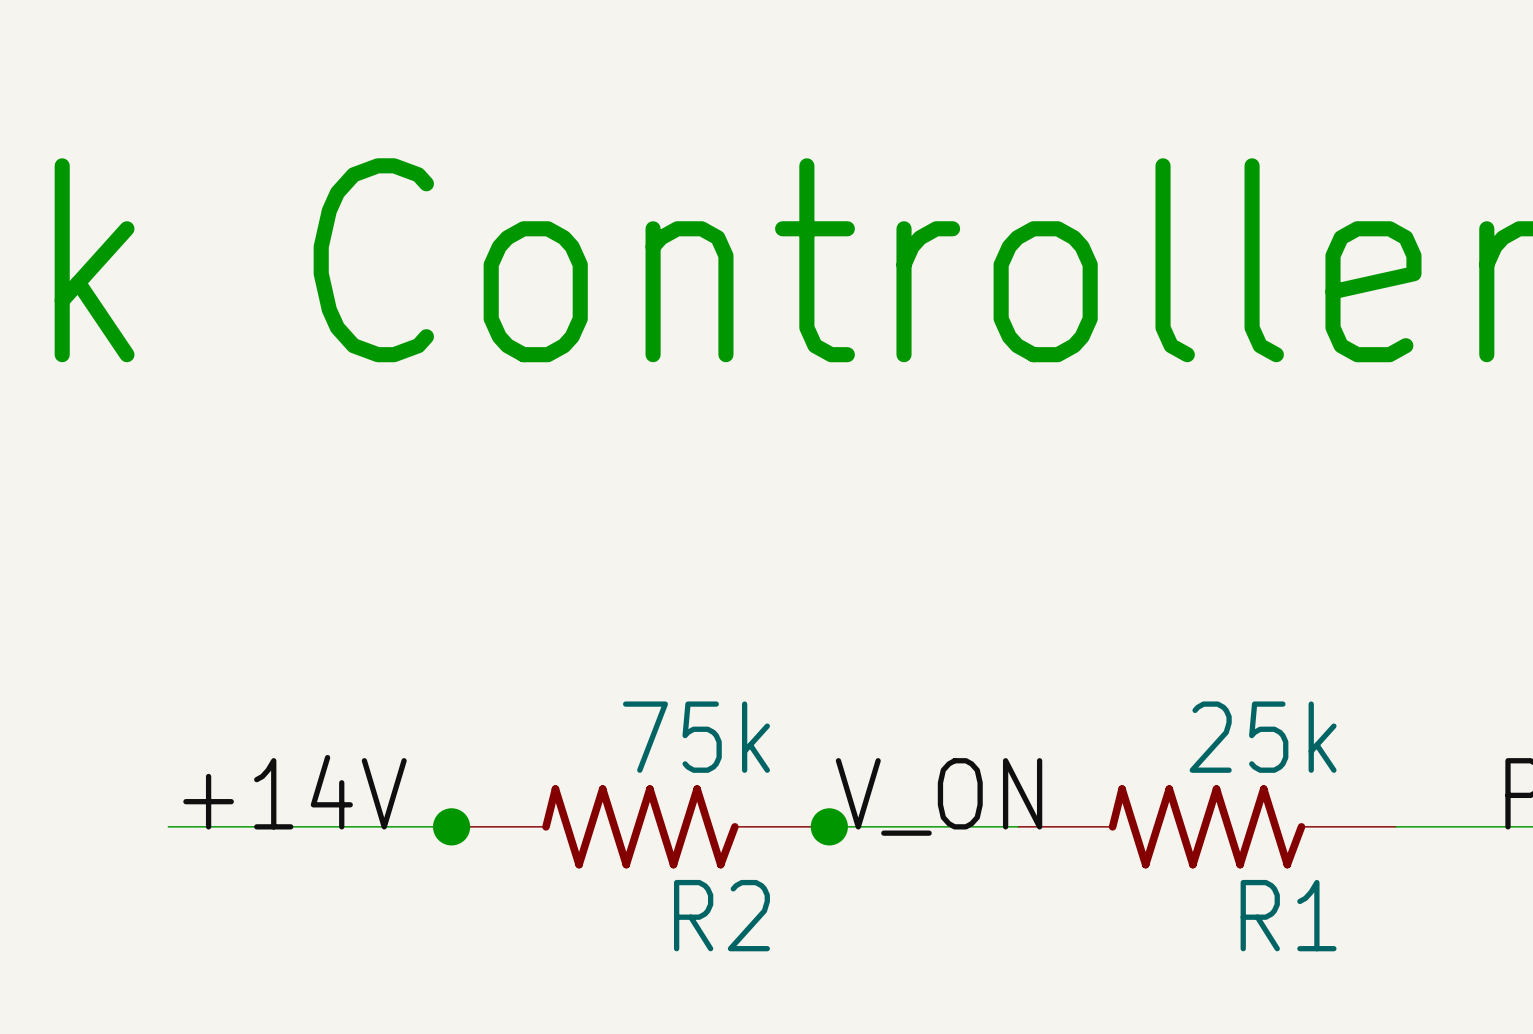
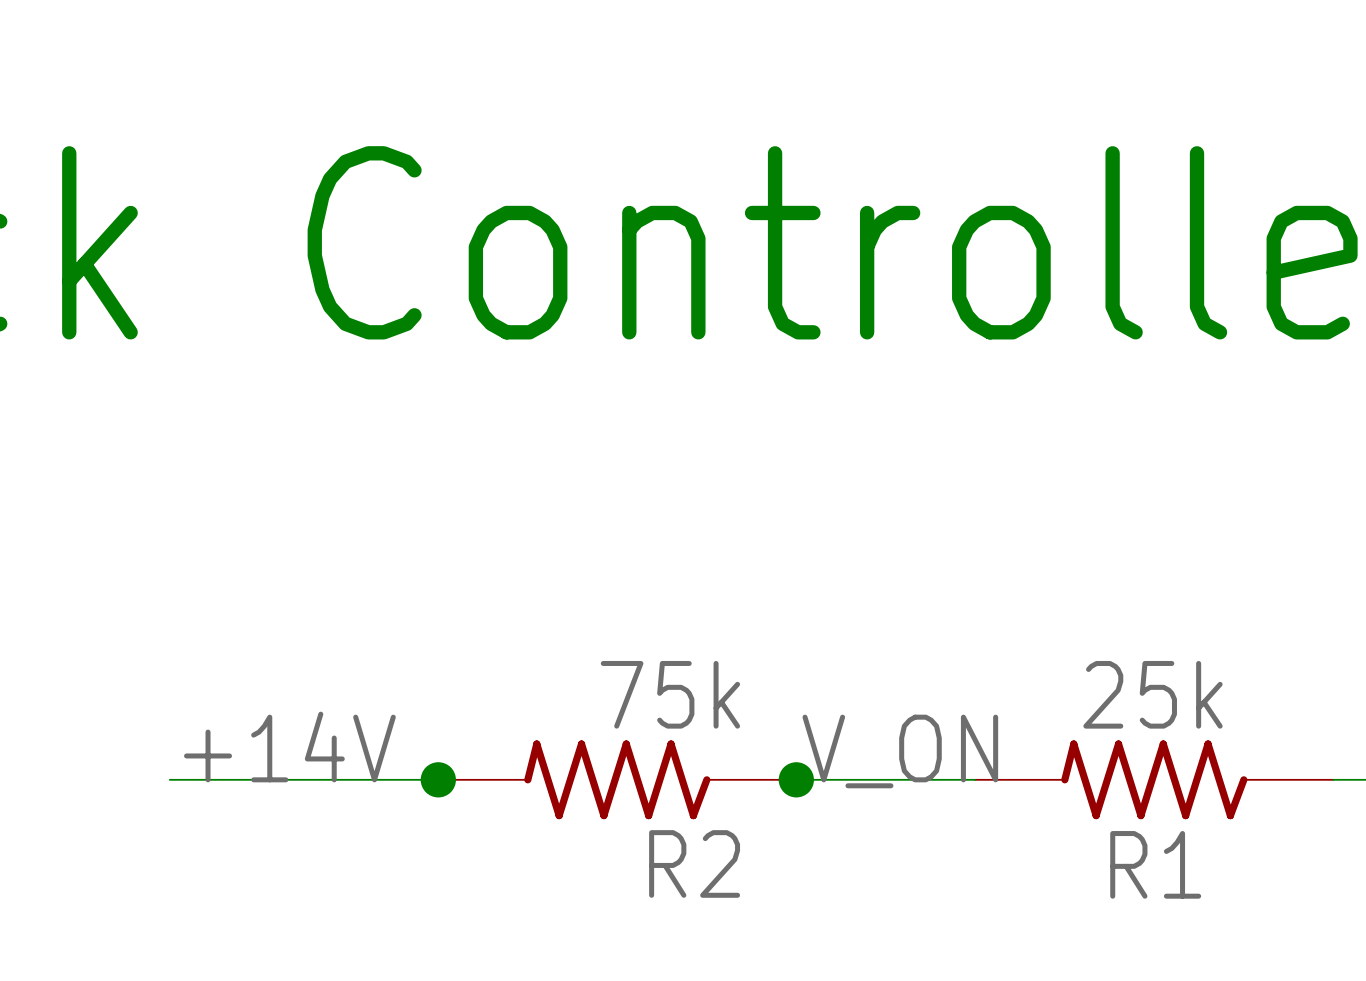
R1 value position: 25k (1263, 737) -> 25k (1153, 694)
R1 name position: R1 (1288, 915) -> R1 (1155, 864)

